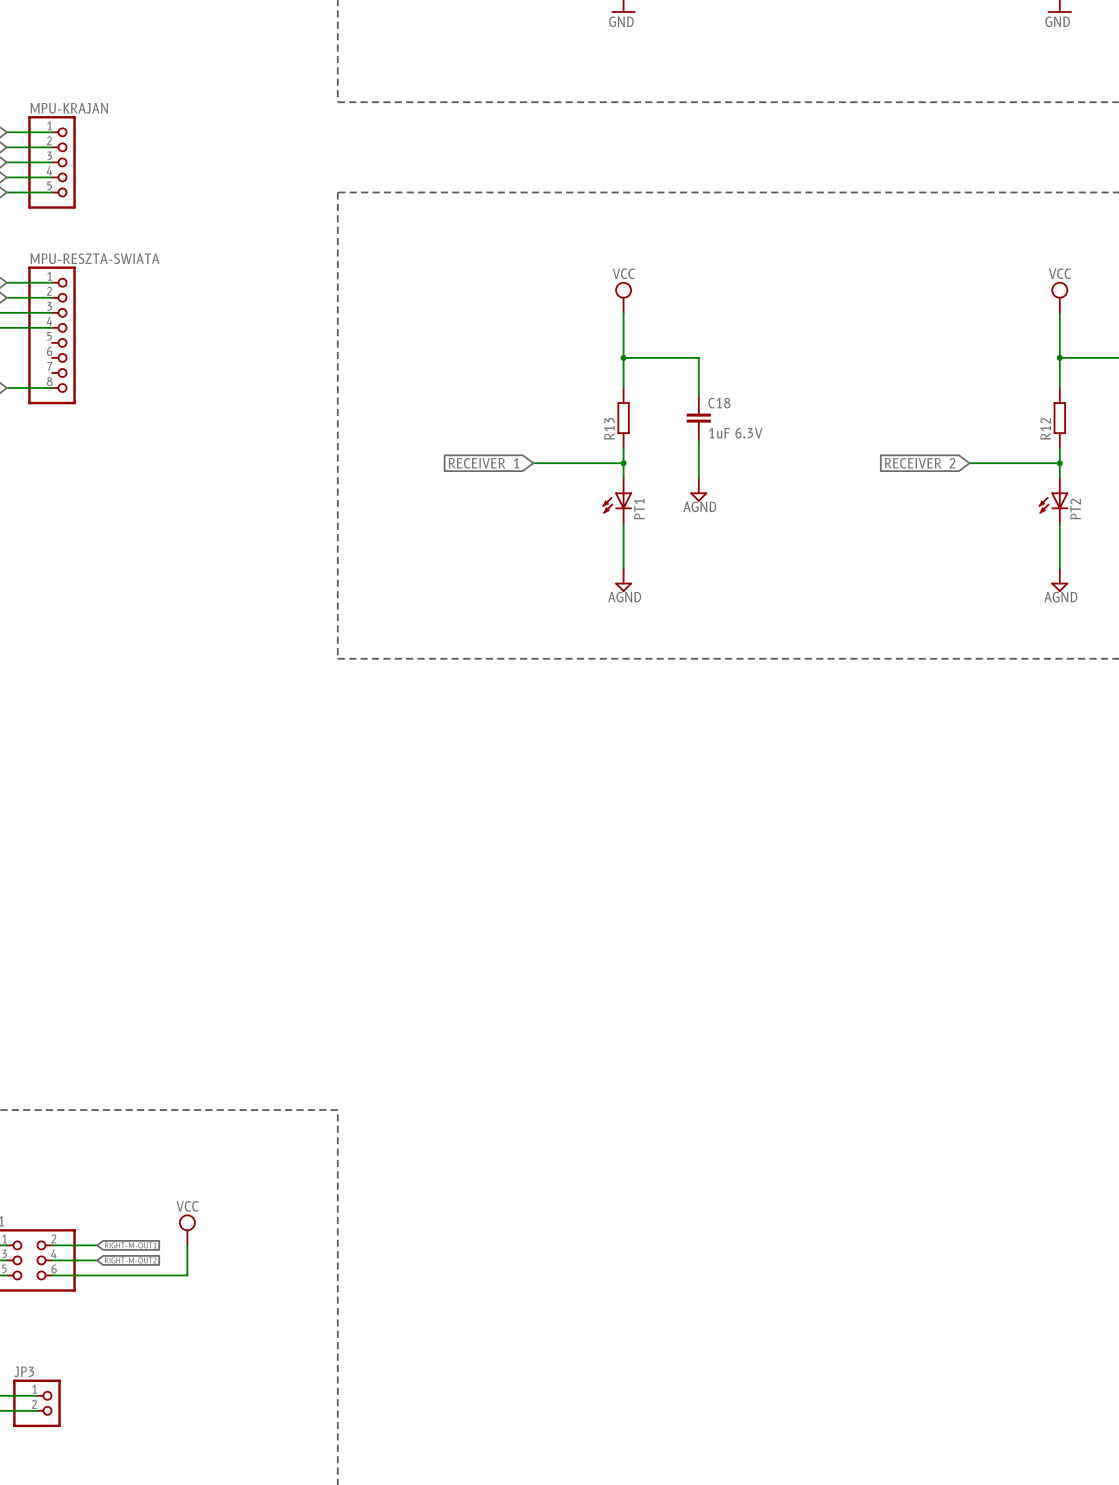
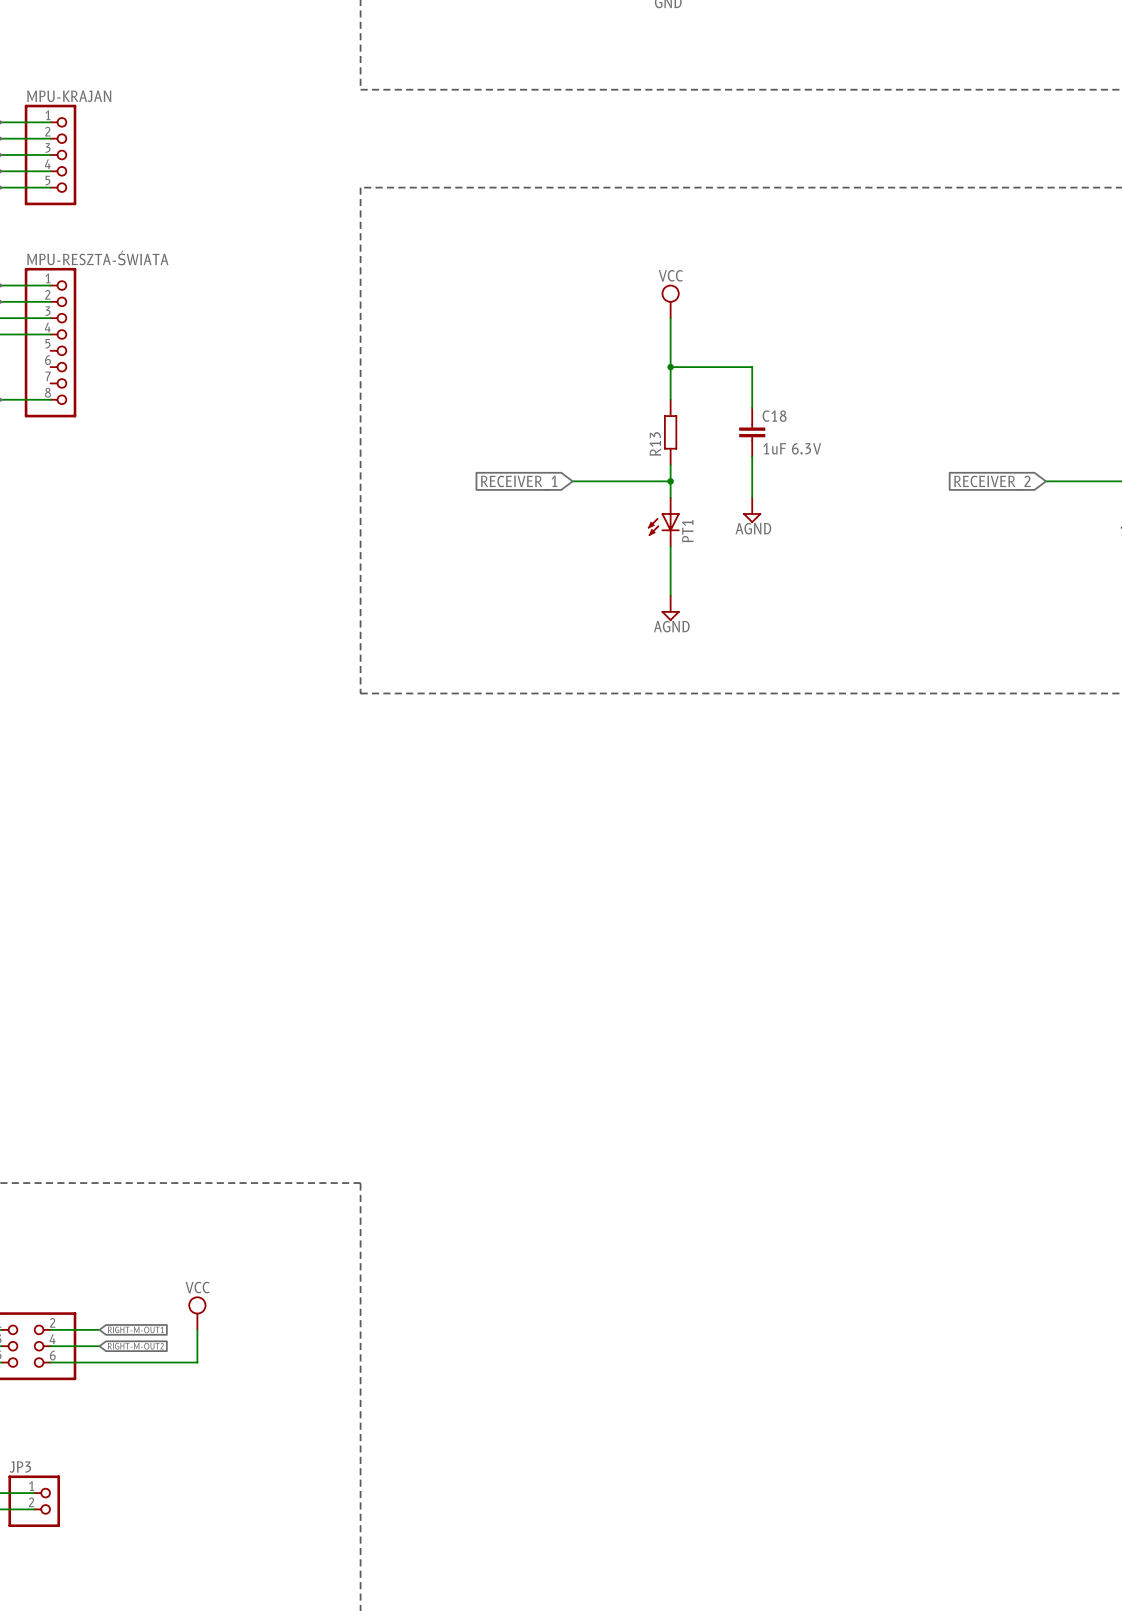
MPU-RESZTA-SWIATA name: MPU-RESZTA-SWIATA (94, 258) -> MPU-RESZTA-ŚWIATA (97, 257)

